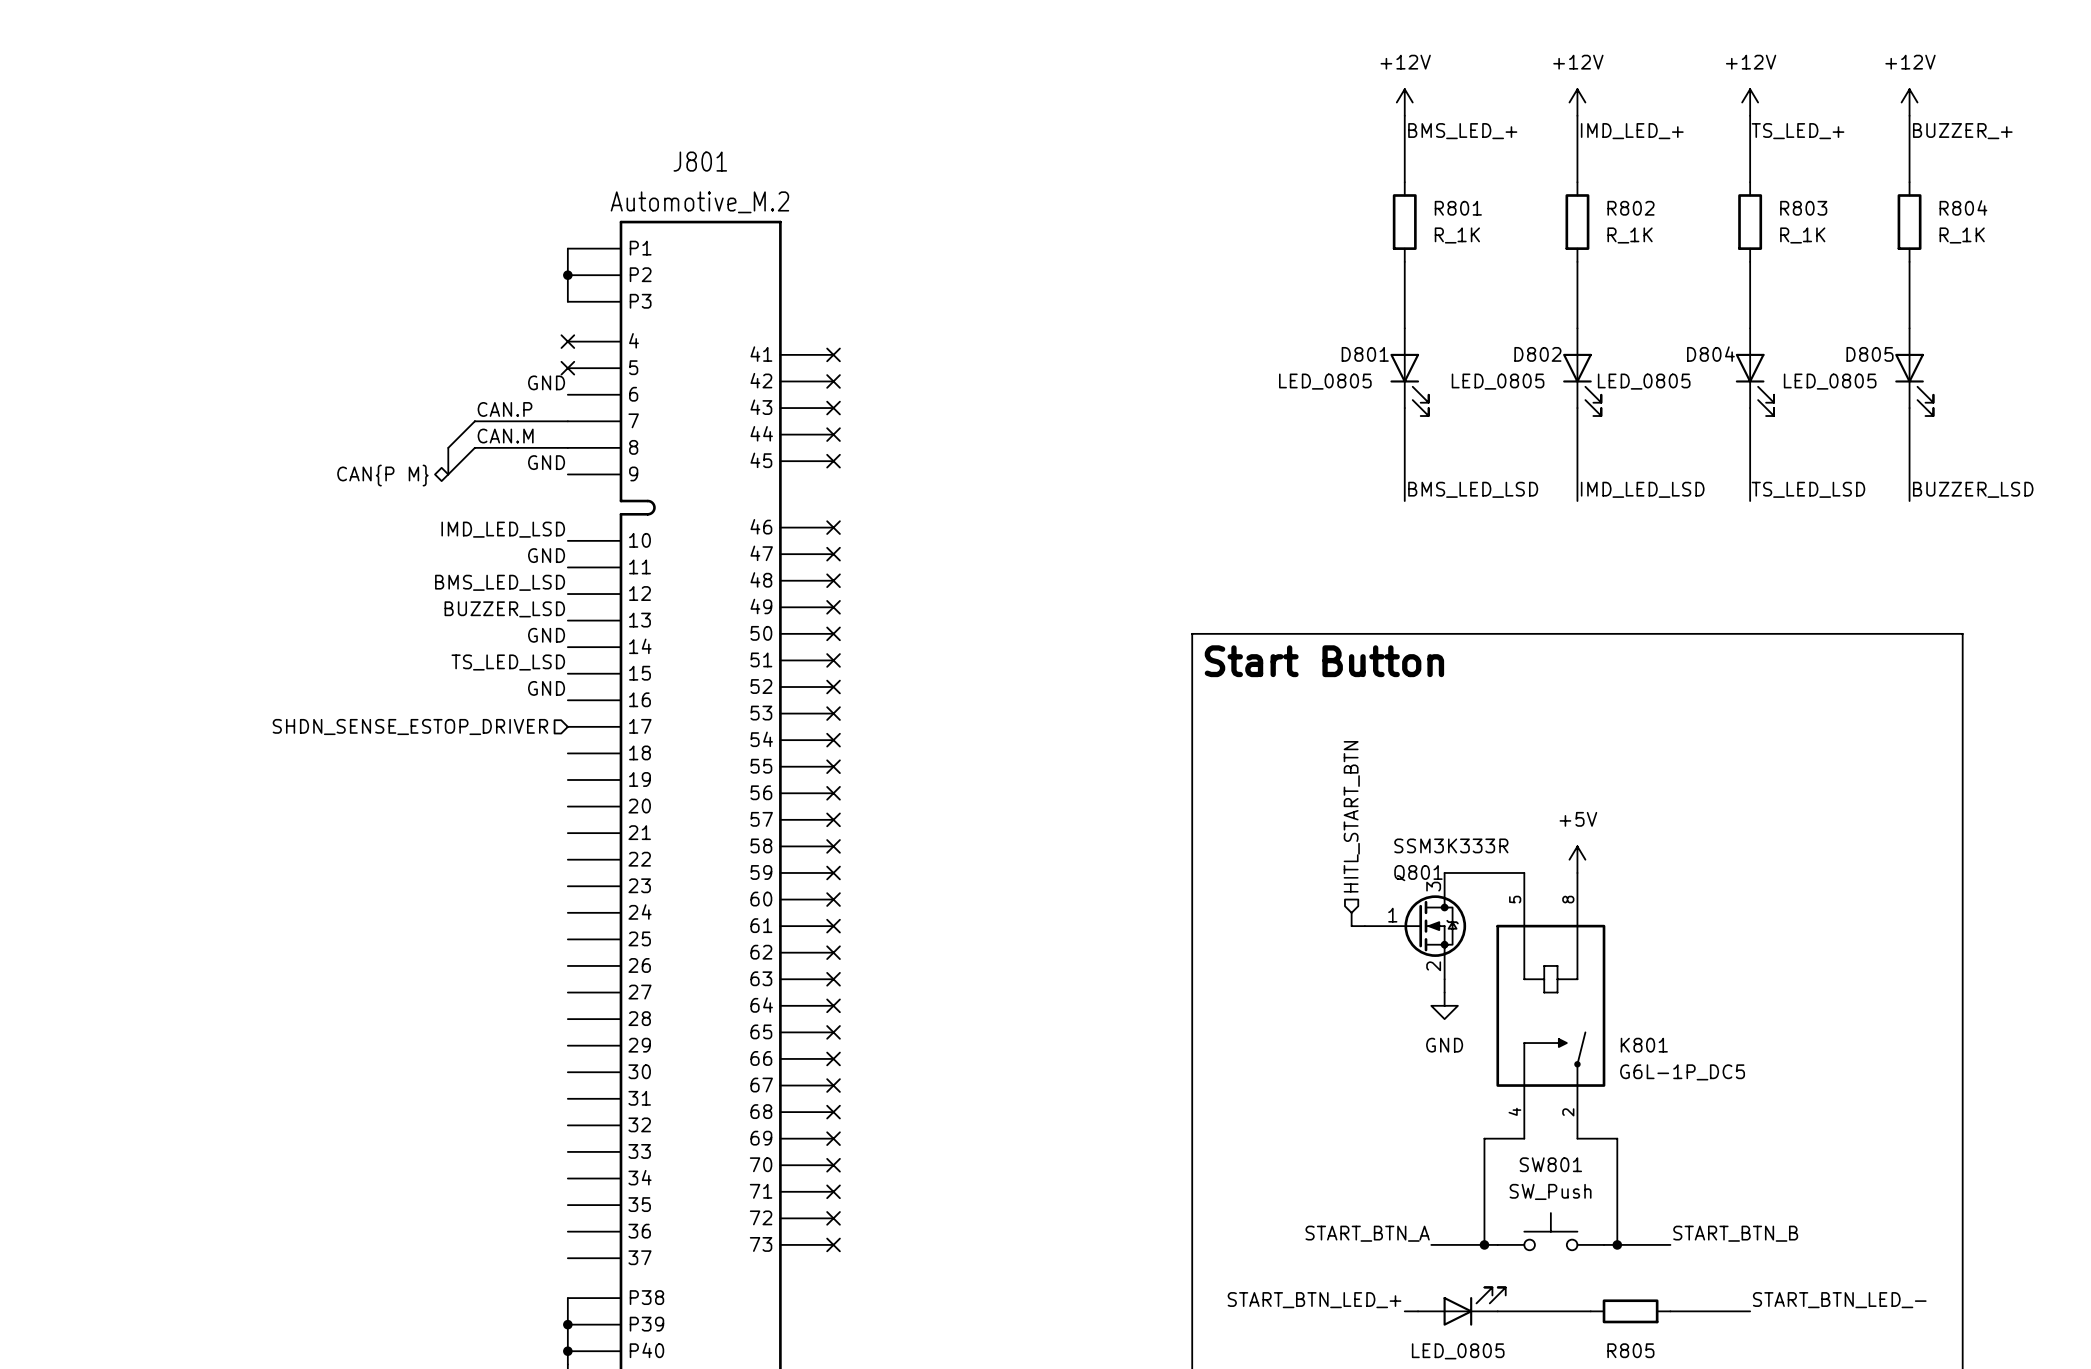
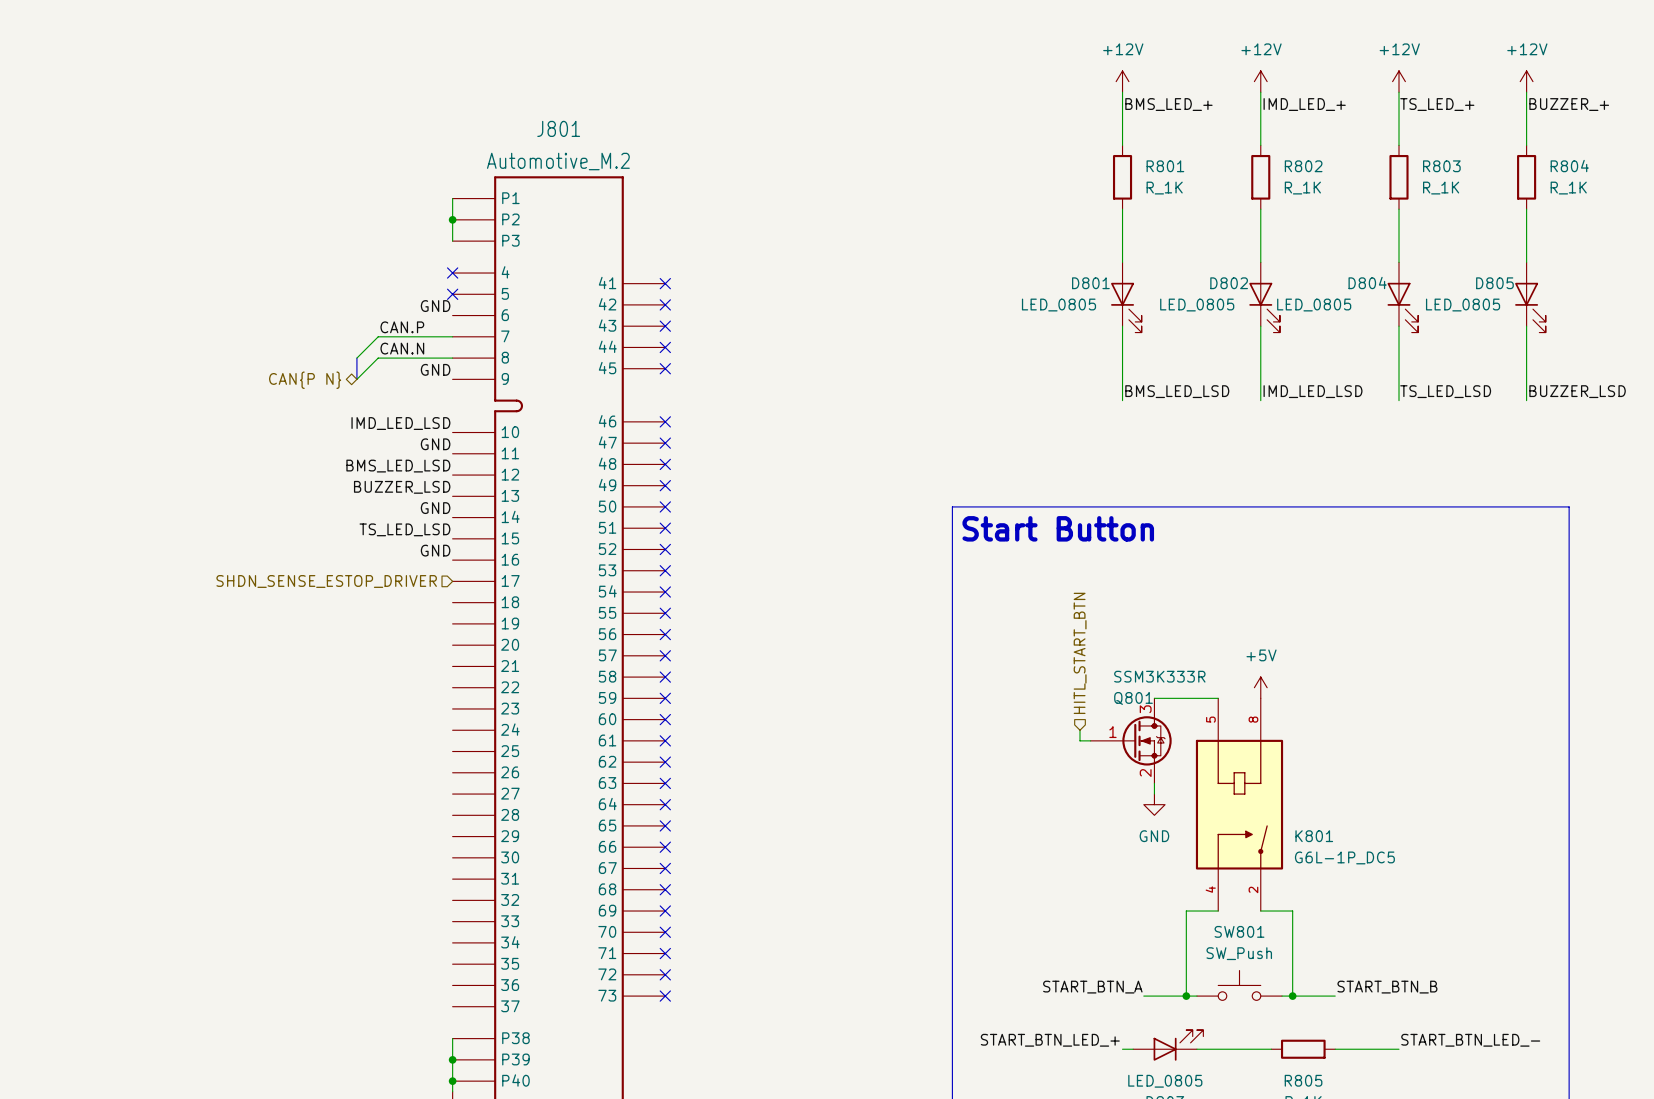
label: CAN.M (505, 436) -> CAN.N (402, 348)
hierarchical label: CAN{P M} (382, 475) -> CAN{P N} (305, 380)

